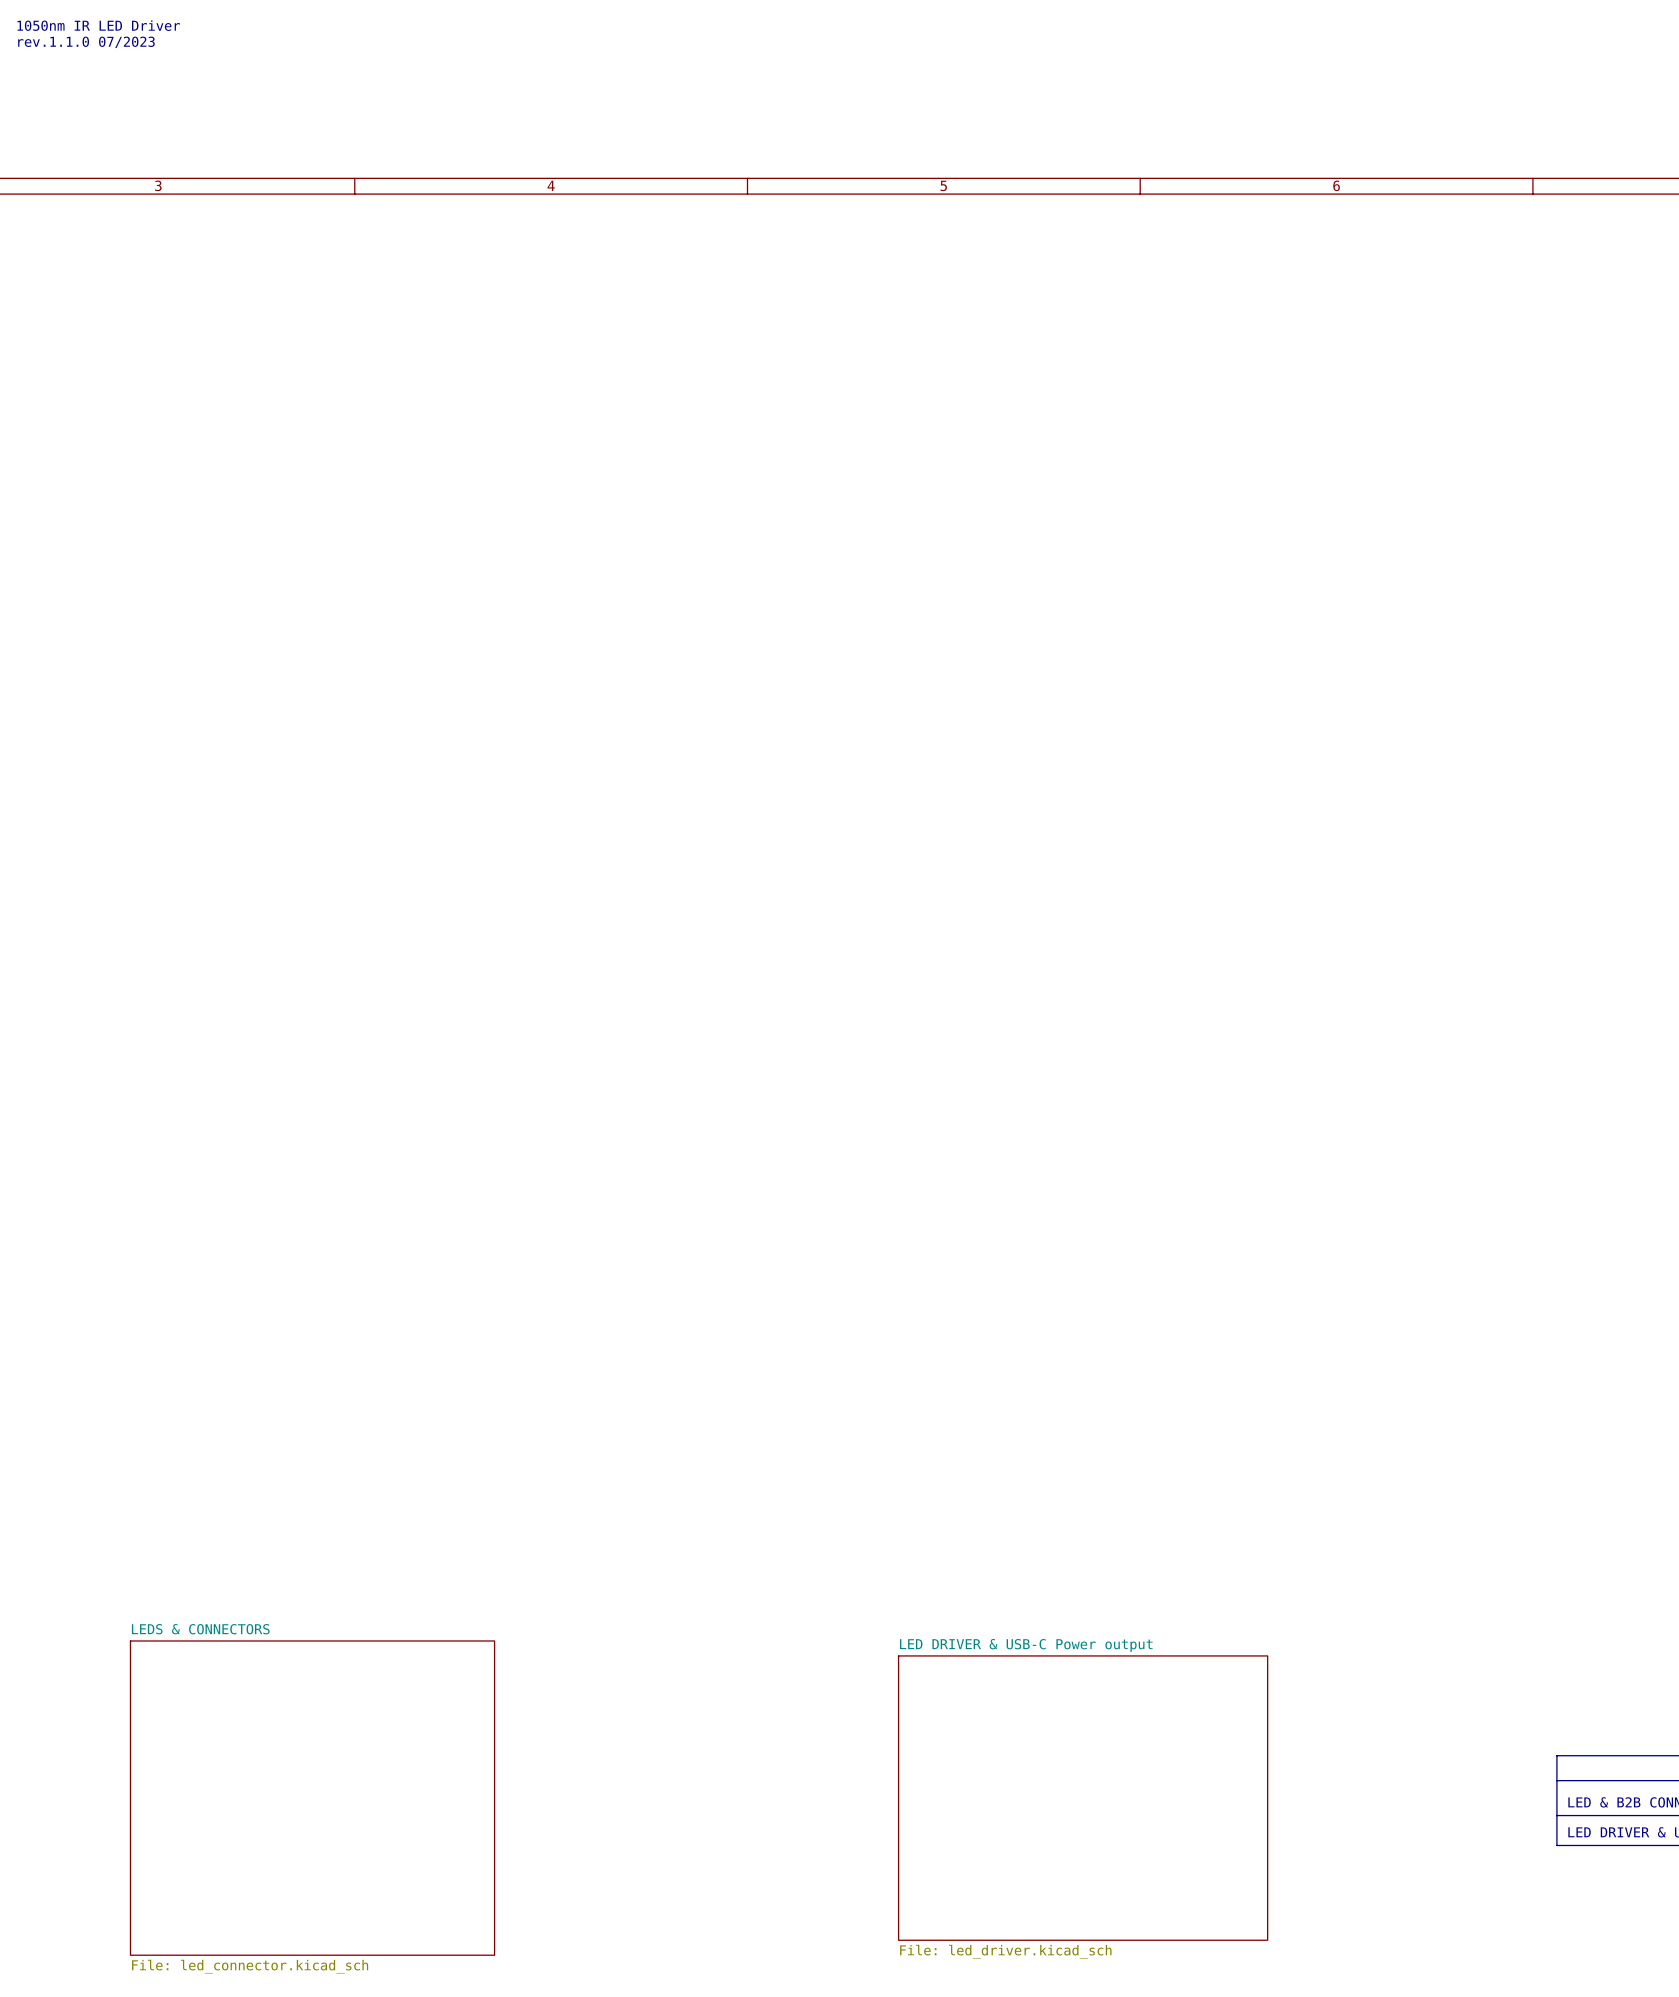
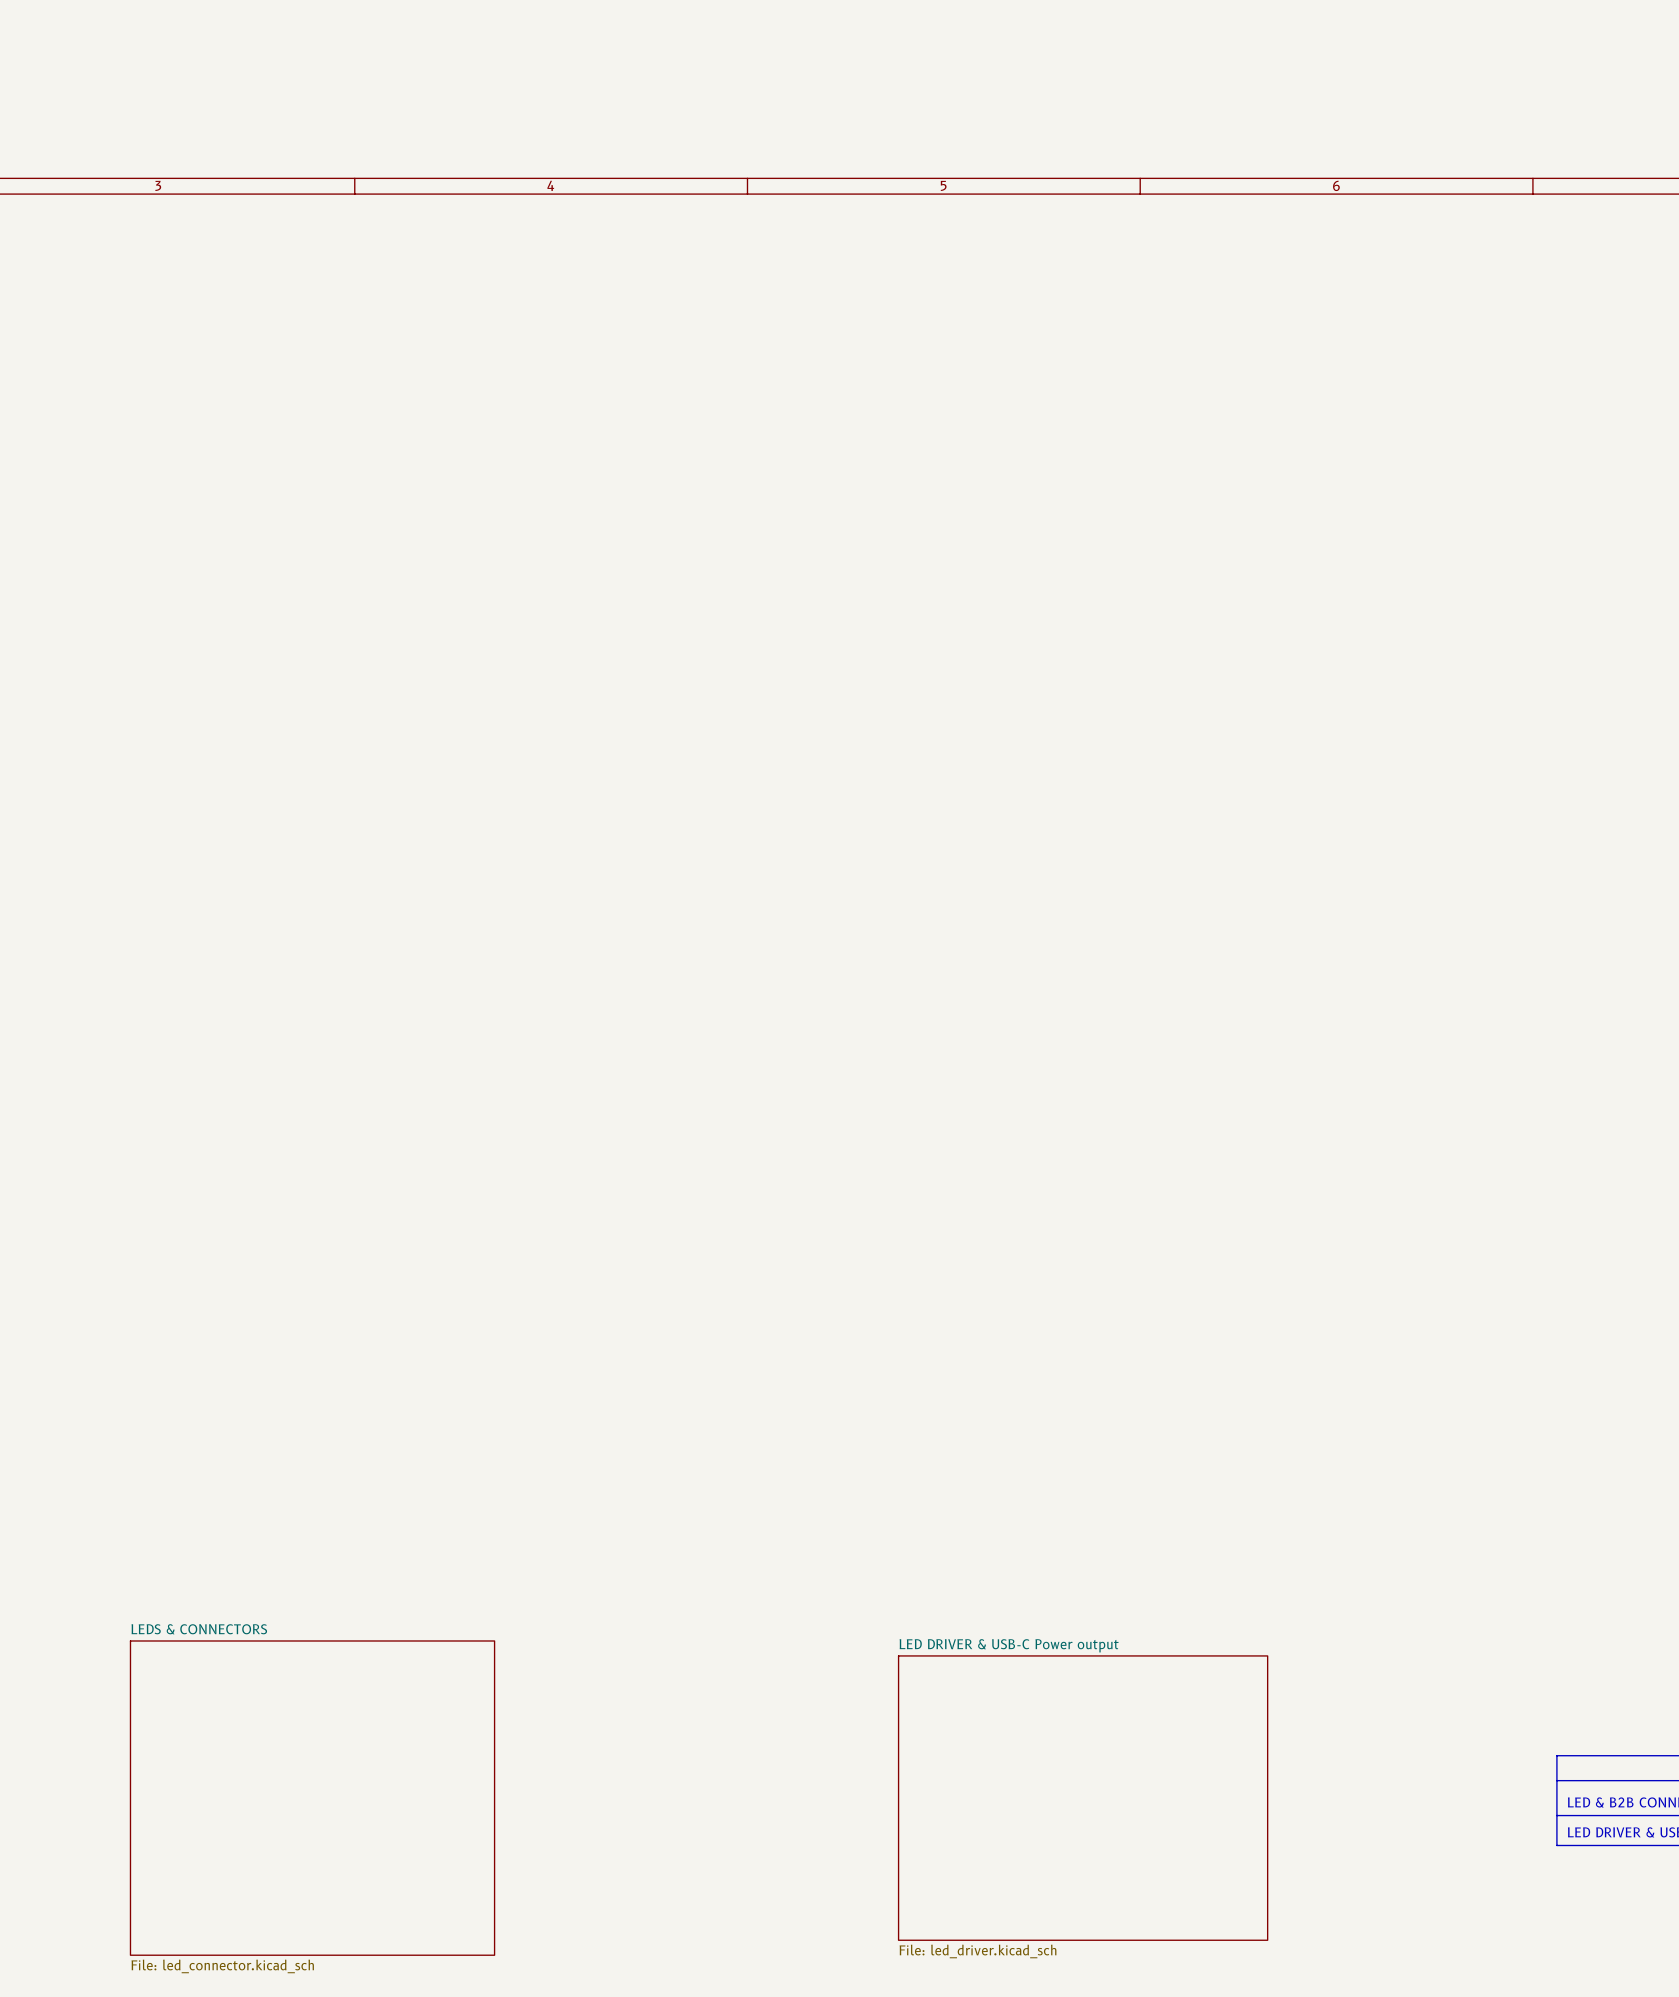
text: 1050nm IR LED Driver (98, 25) -> none
text: rev.1.1.0 07/2023 (86, 42) -> none

